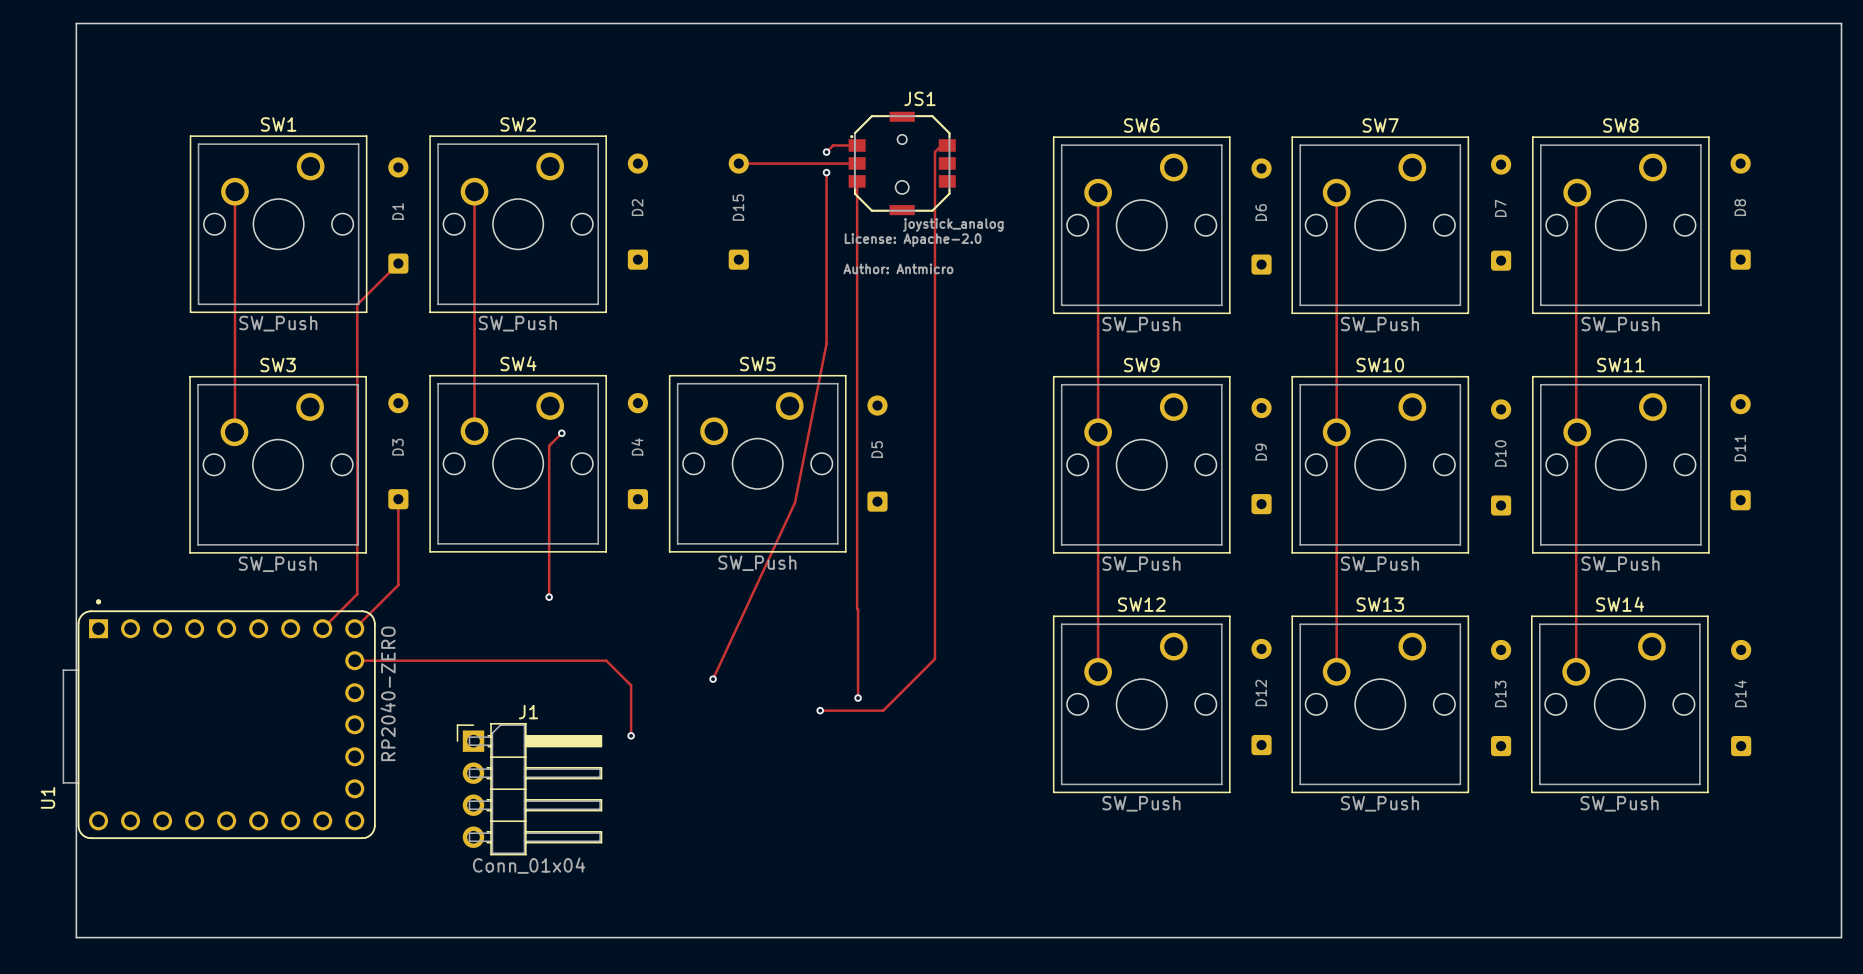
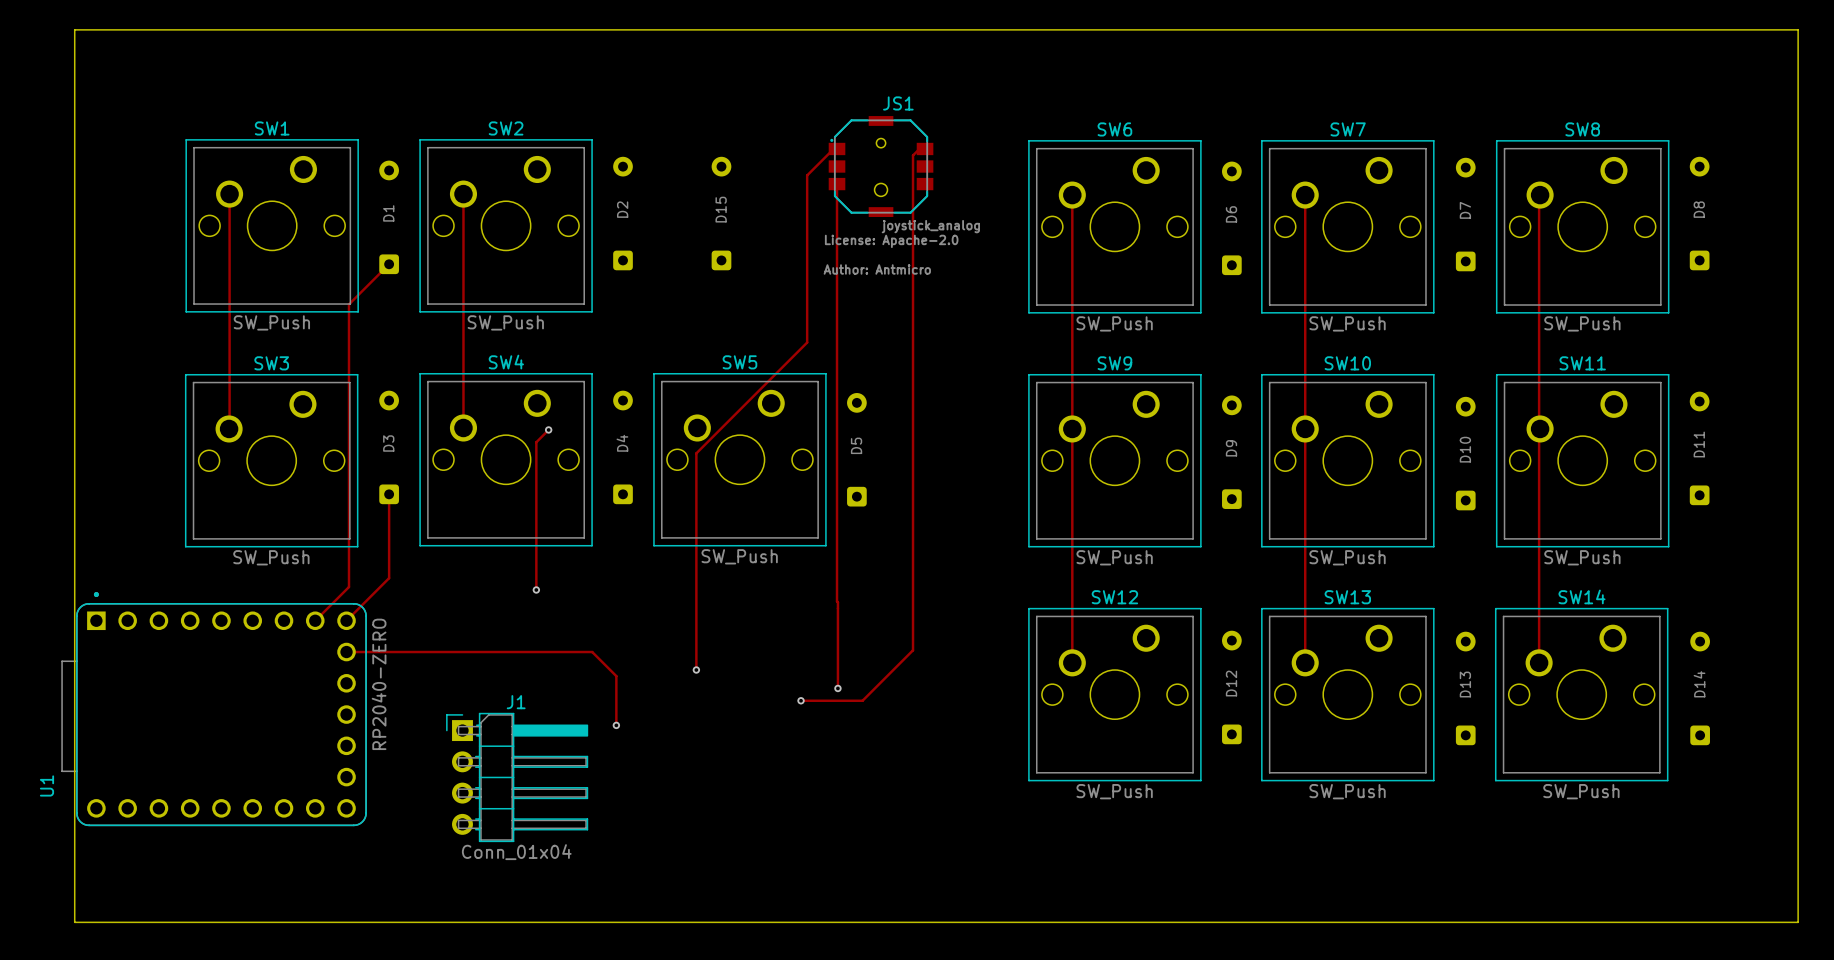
track: none -> (834, 147) (807, 175)
track: (857, 145) (833, 145) (826, 152) -> none
via: (826, 152) -> none
track: (738, 163) (855, 163) -> none
via: (826, 172) -> none
track: (826, 343) (795, 502) (713, 679) -> (807, 342) (696, 453) (696, 669)

